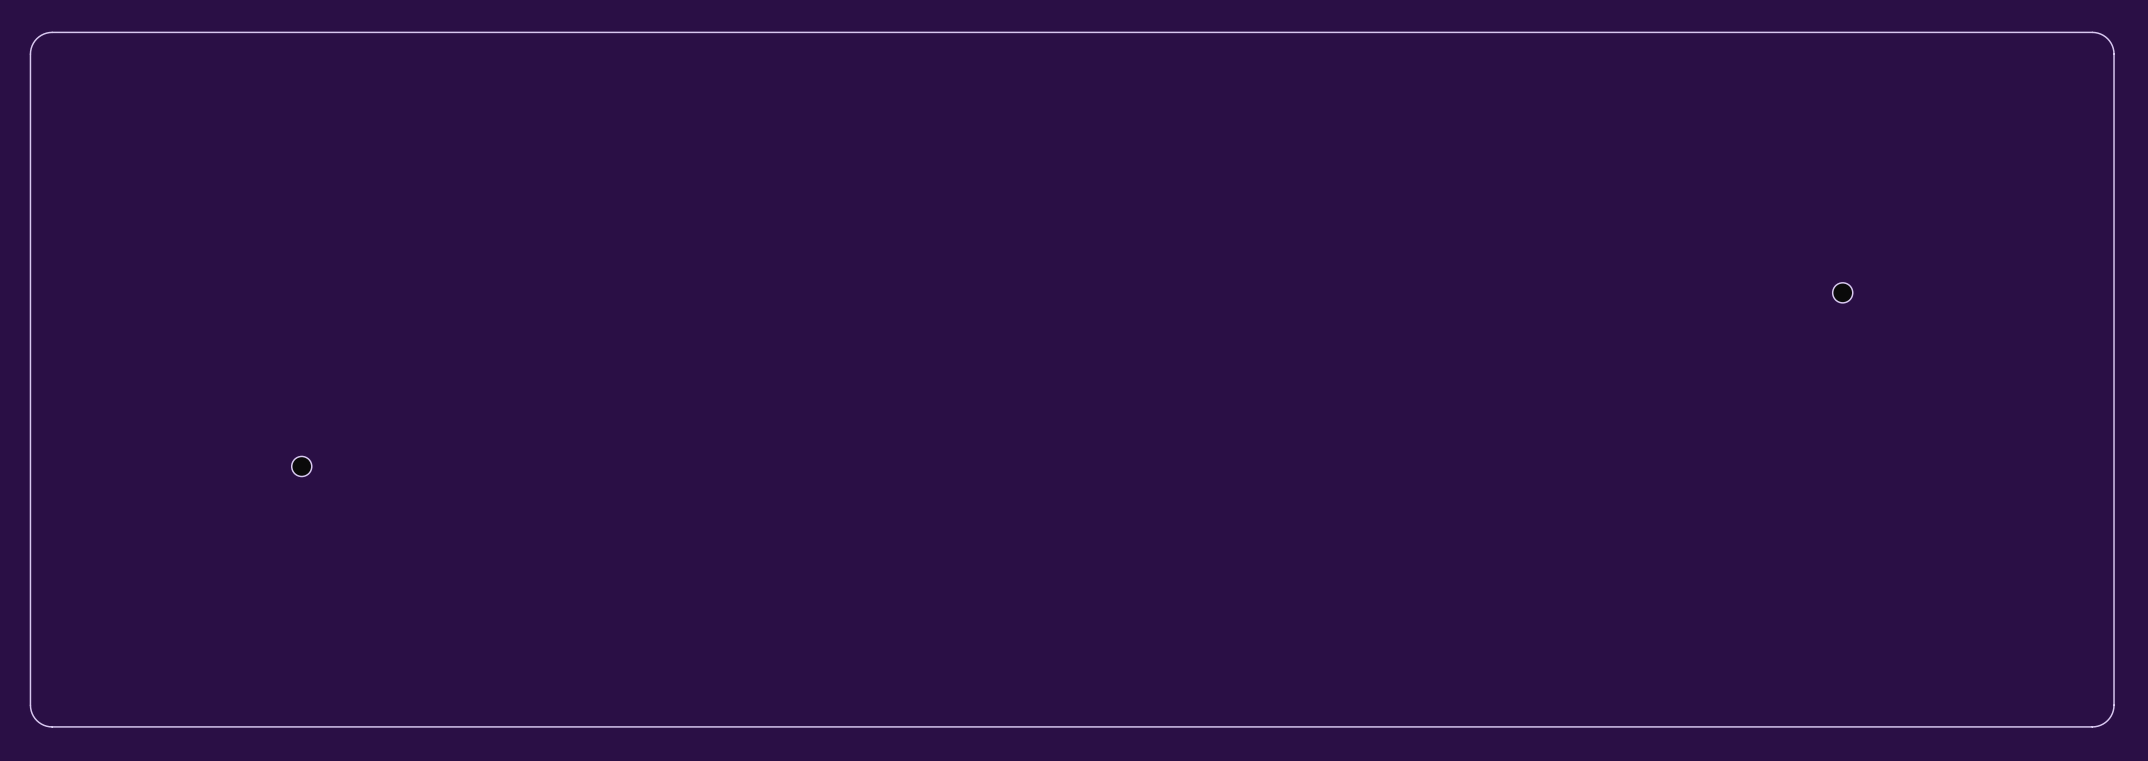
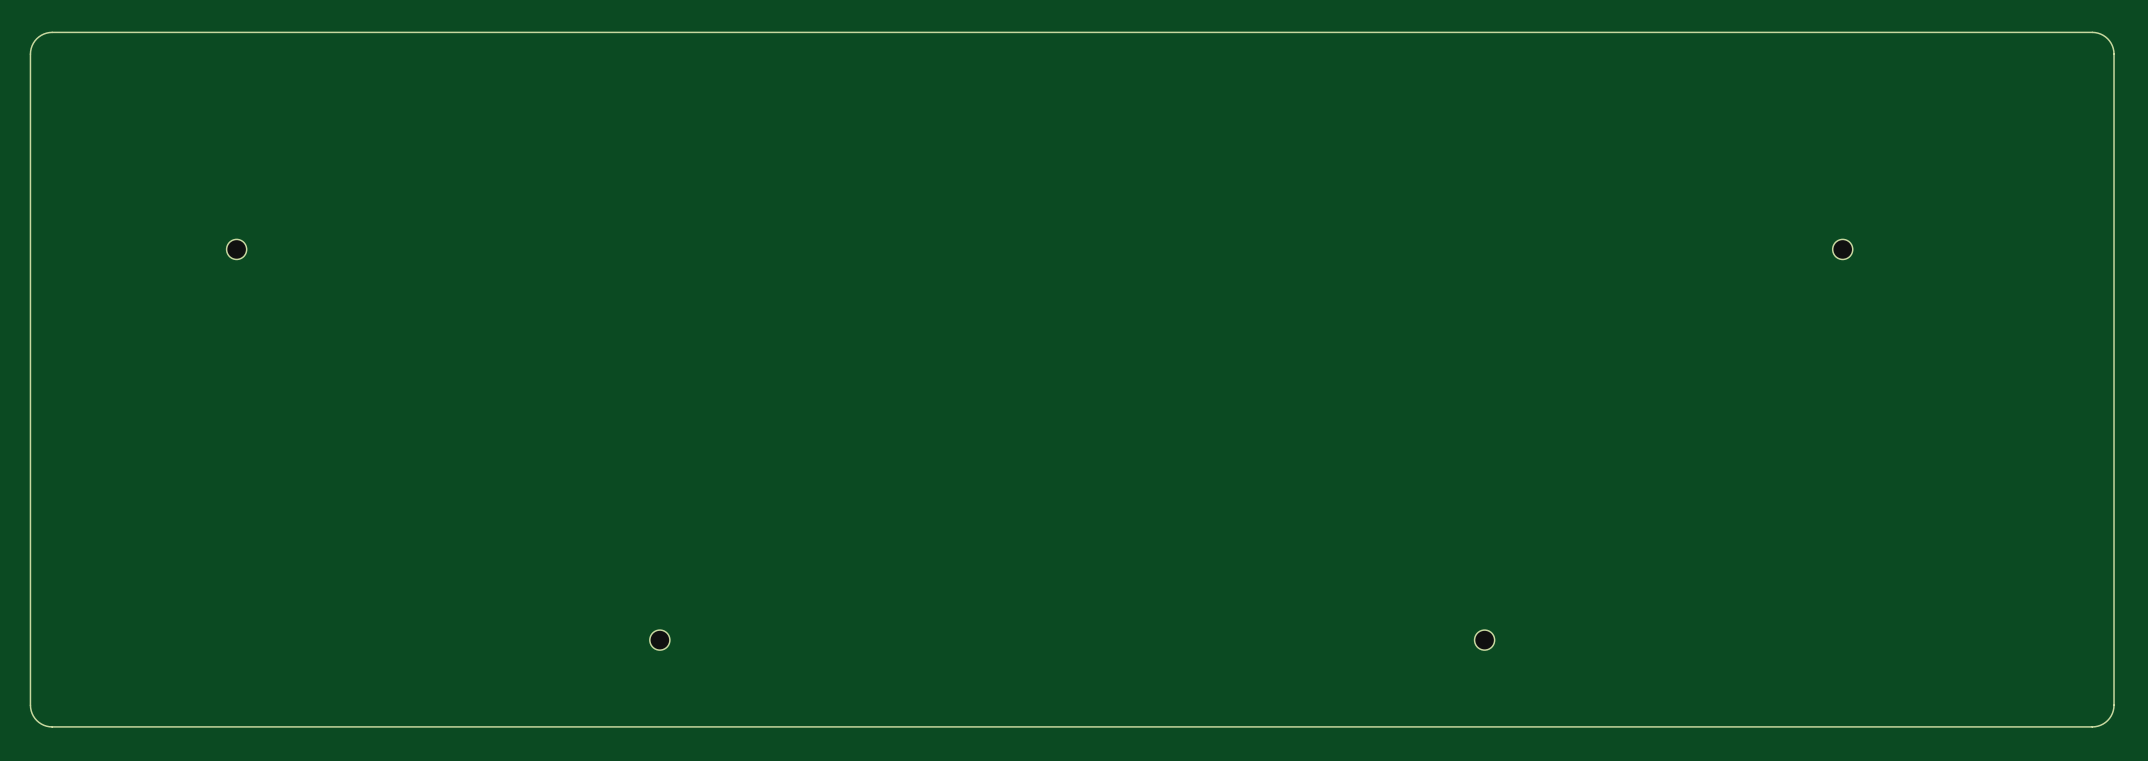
part: none -> (236, 249)
part position: (1842, 292) -> (1842, 249)
part: (301, 466) -> none
part: none -> (659, 640)
part: none -> (1484, 640)

